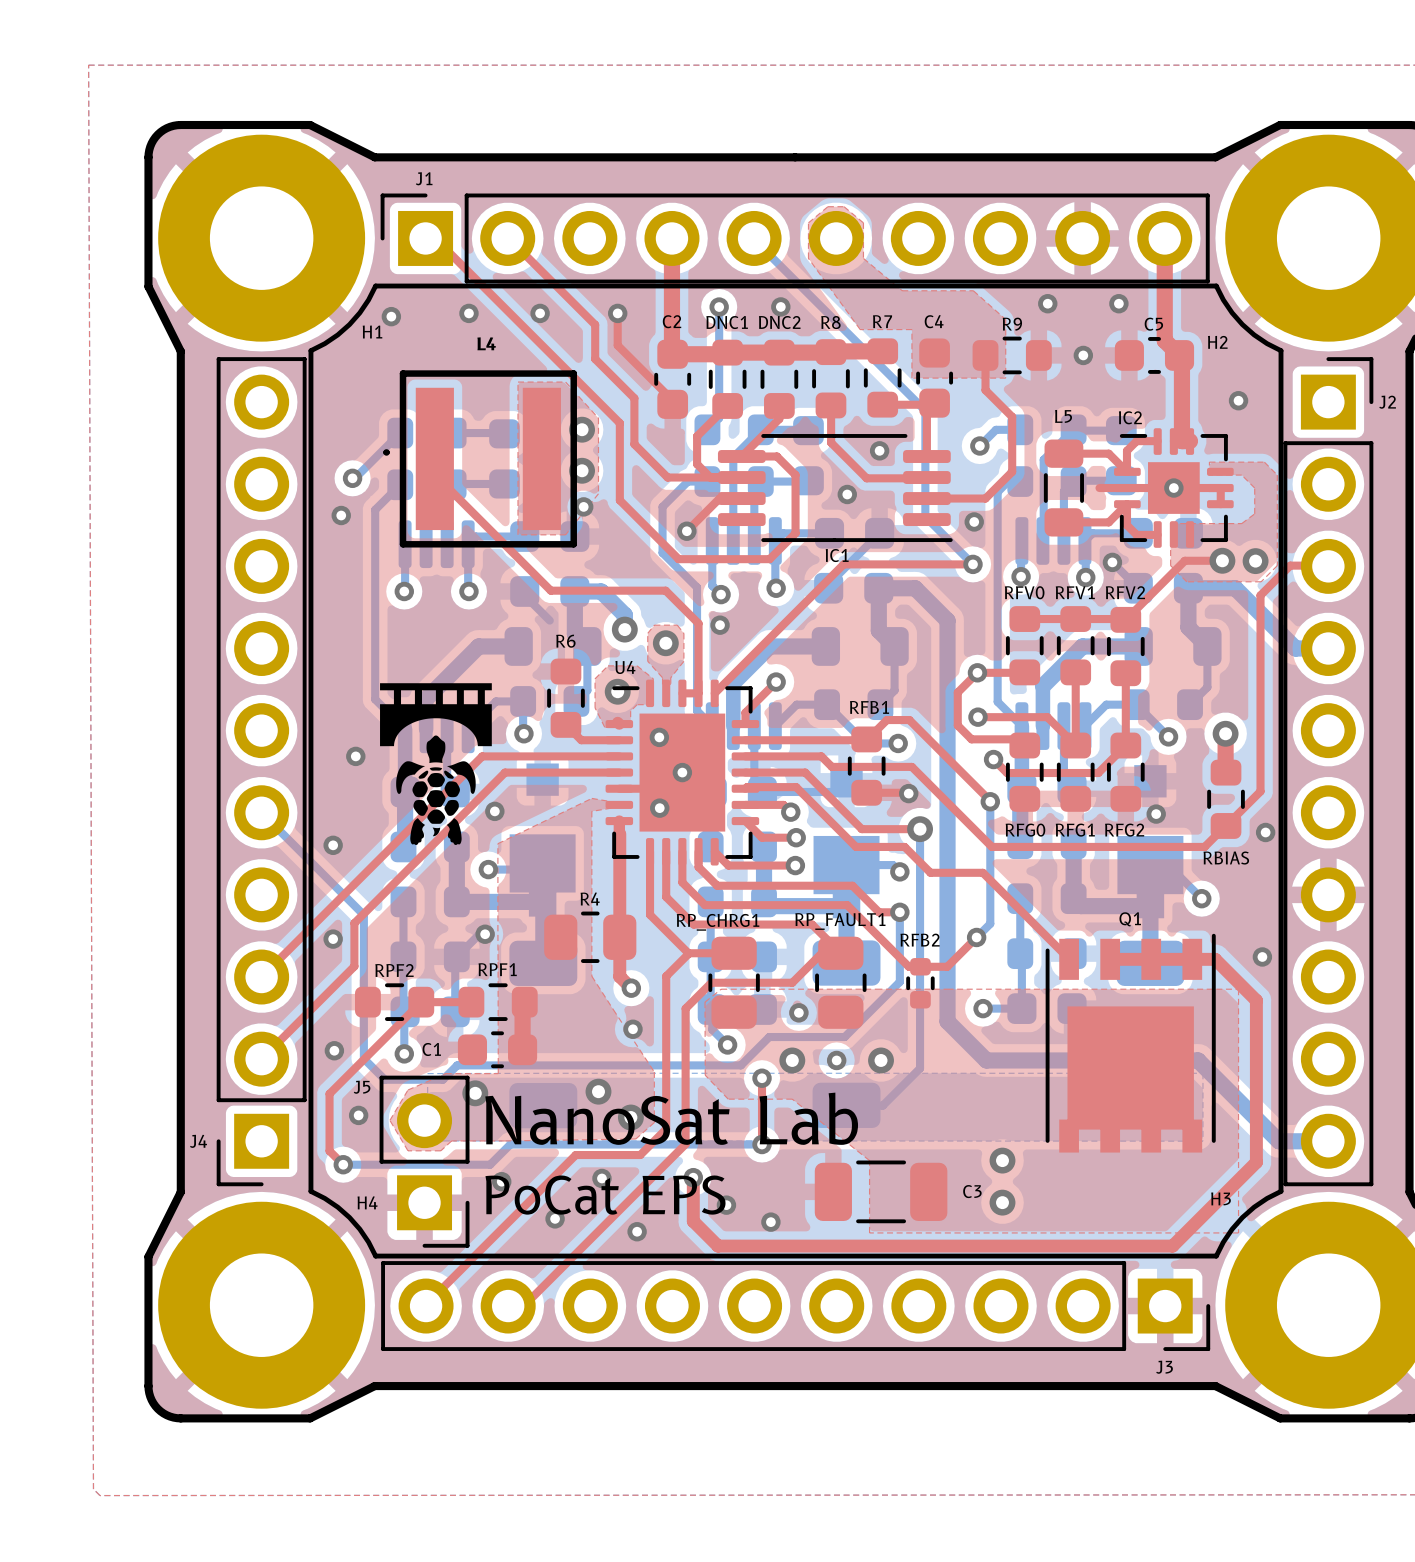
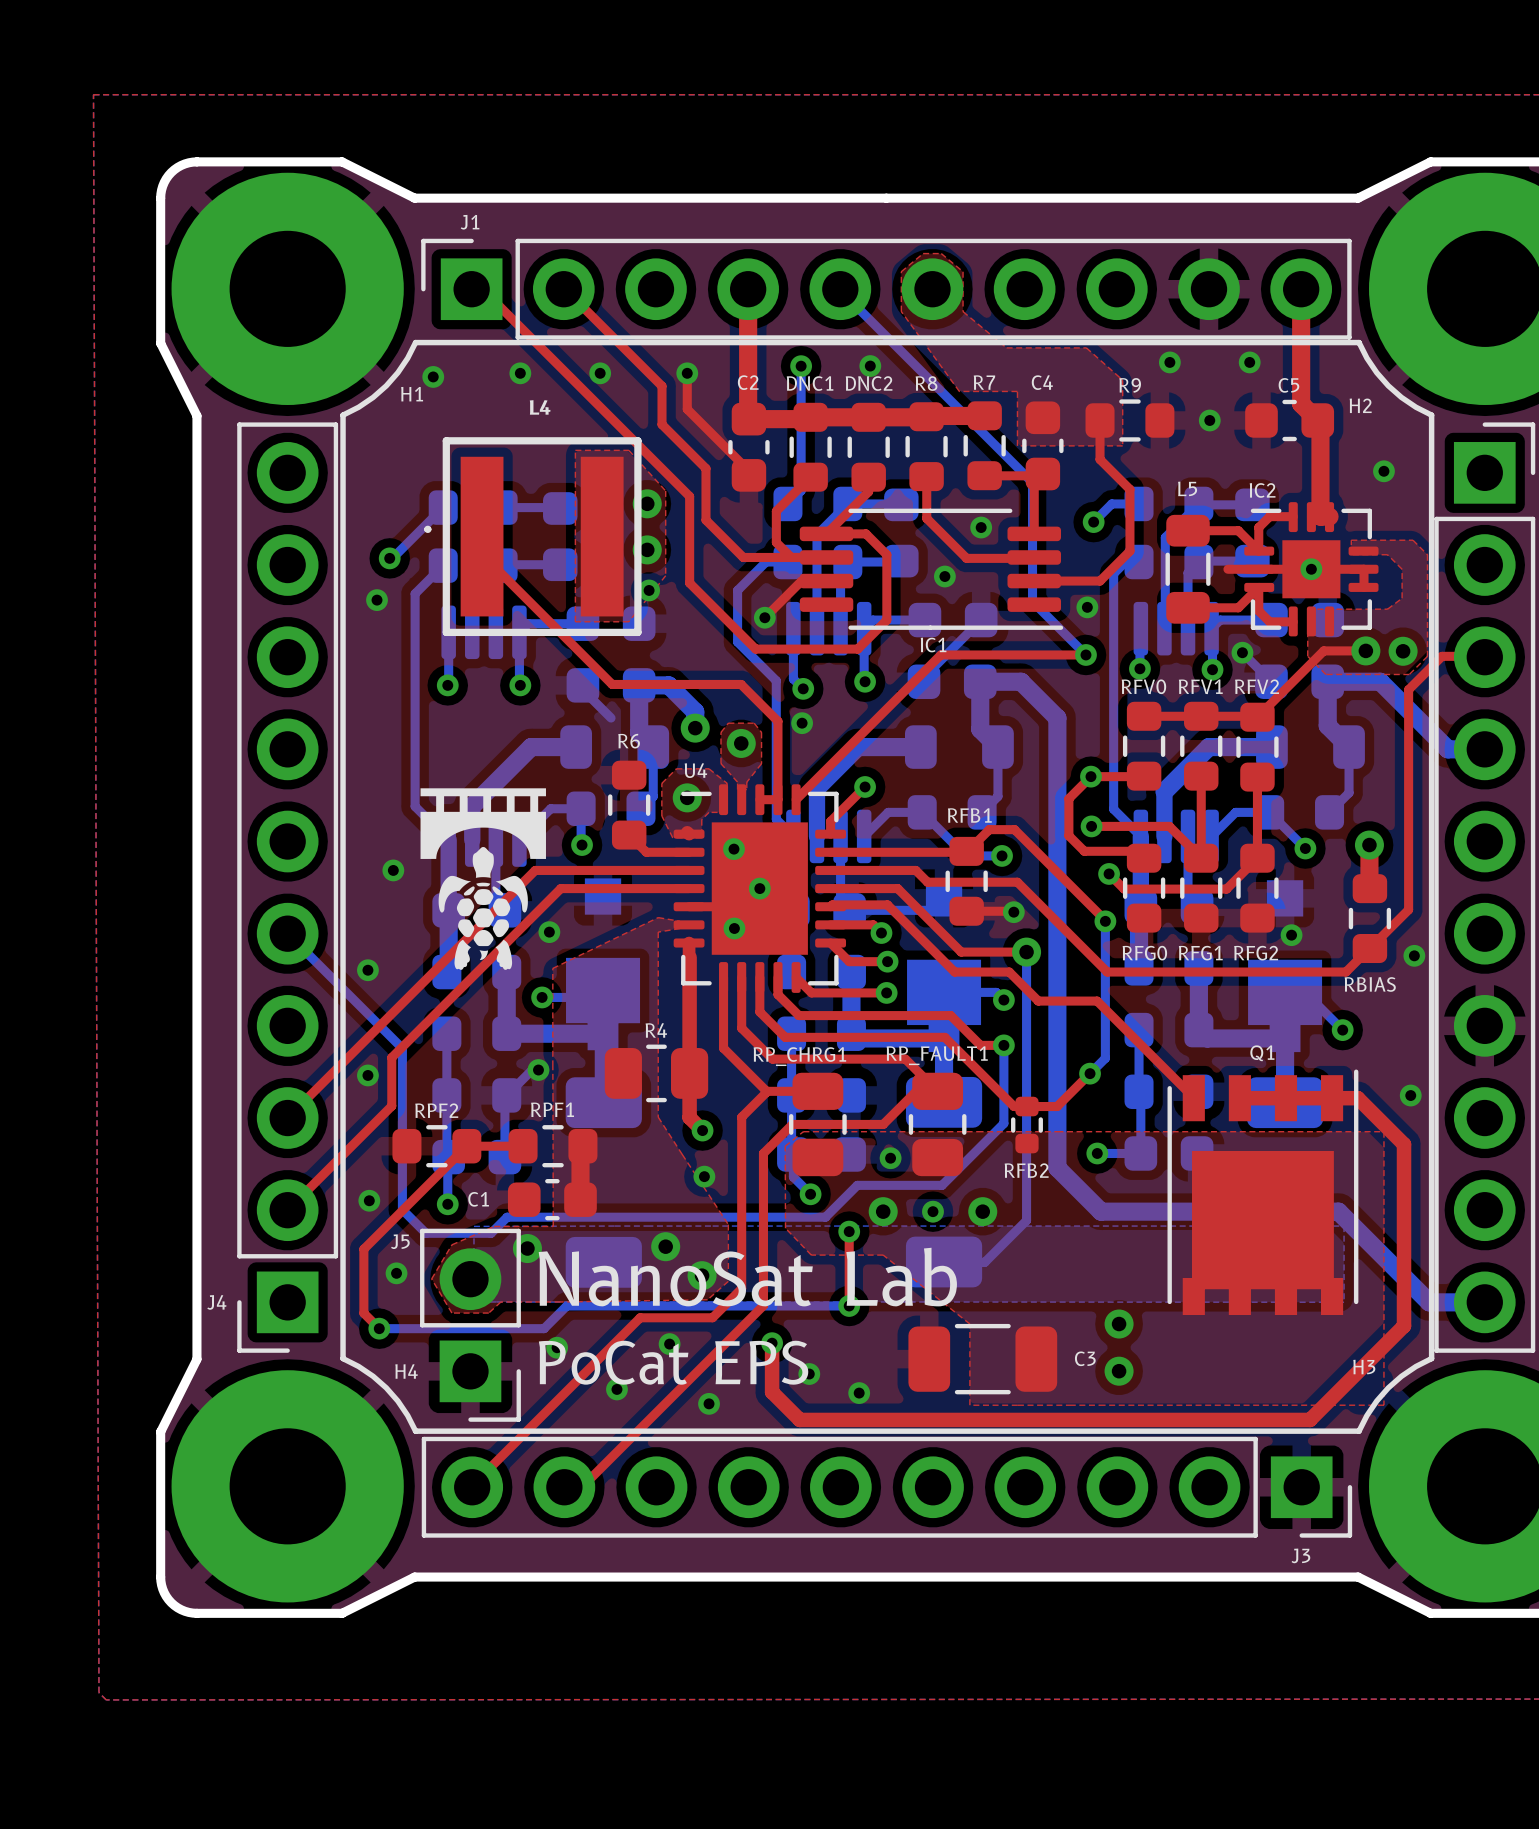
RFB2 name position: RFB2 (920, 940) -> RFB2 (1026, 1170)

